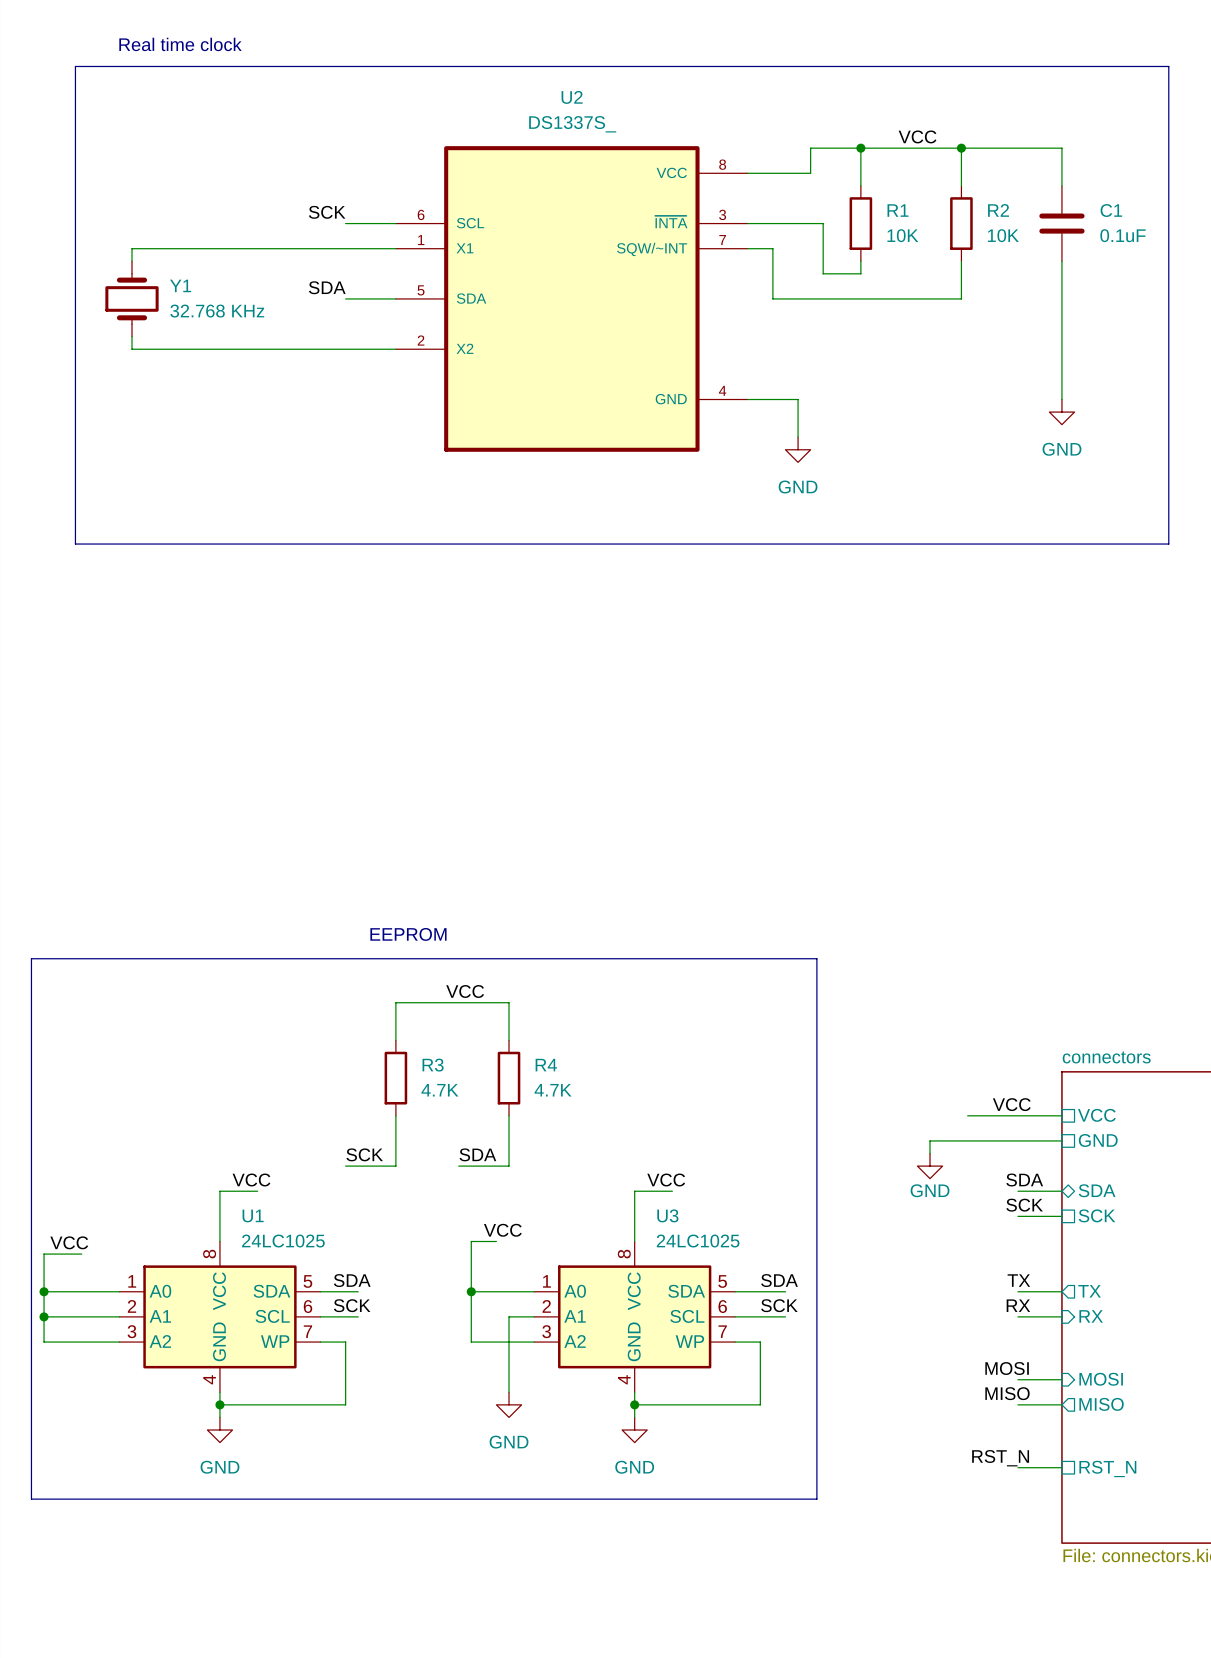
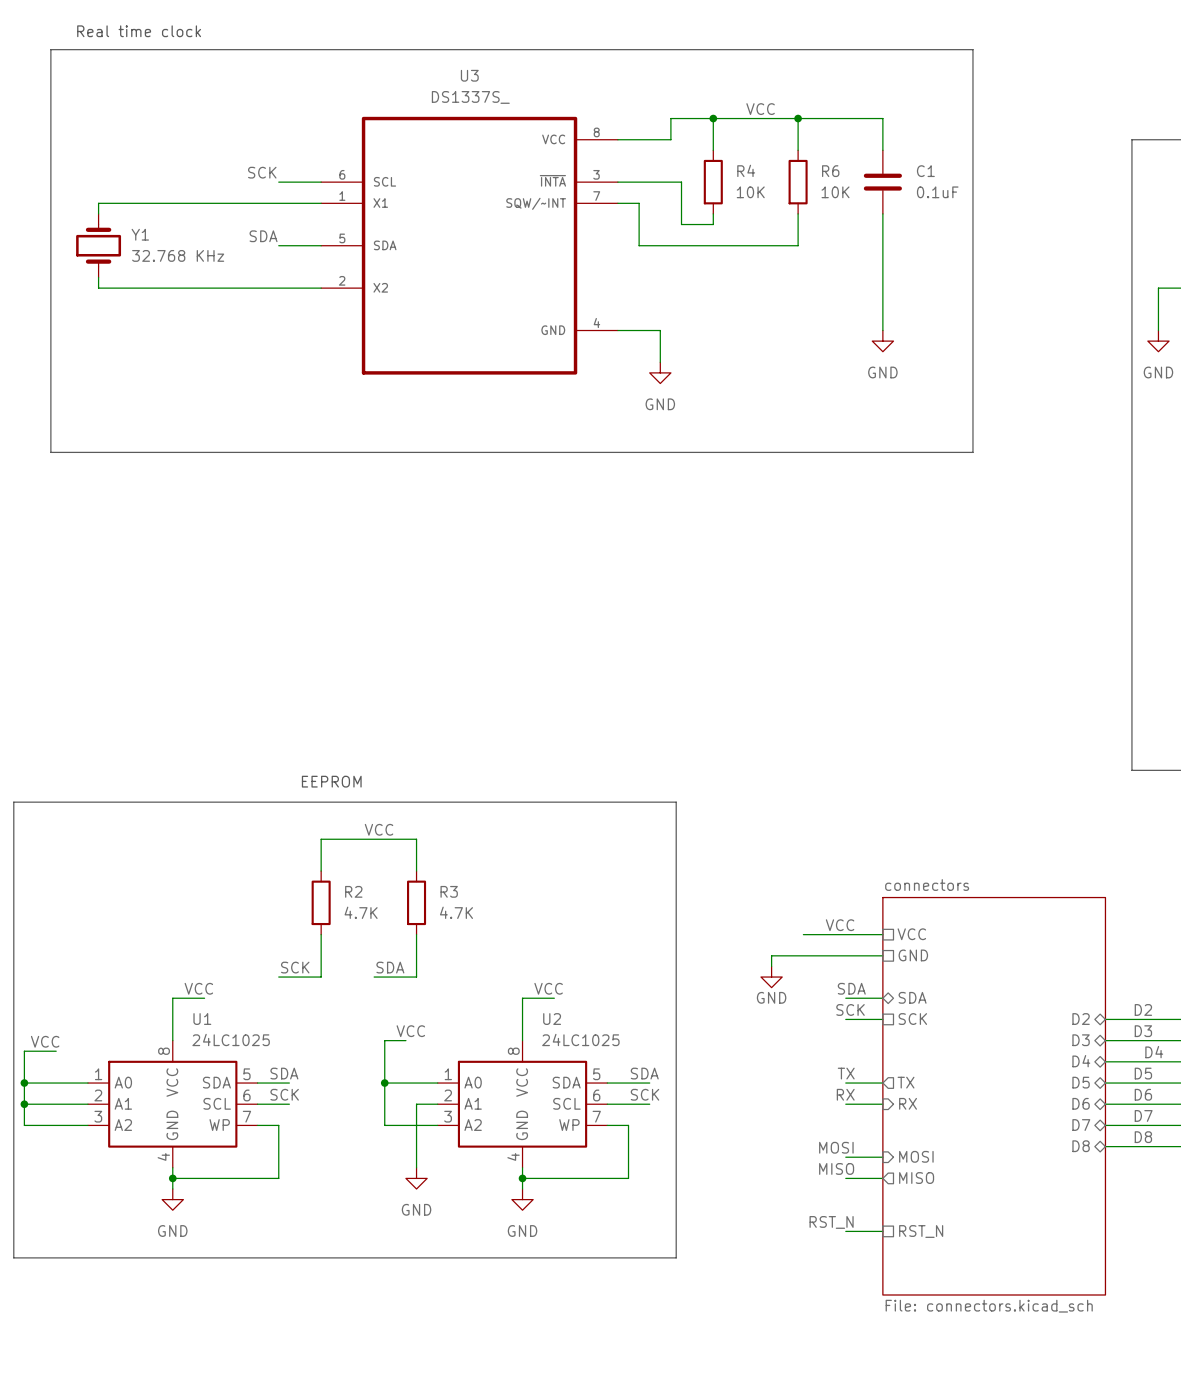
U2 name: U2 (572, 97) -> U3 (469, 75)
R1 name: R1 (898, 210) -> R4 (746, 170)
R2 name: R2 (998, 210) -> R6 (830, 171)
R3 name: R3 (433, 1065) -> R2 (353, 891)
R4 name: R4 (546, 1065) -> R3 (449, 891)
U3 name: U3 (667, 1215) -> U2 (552, 1019)

